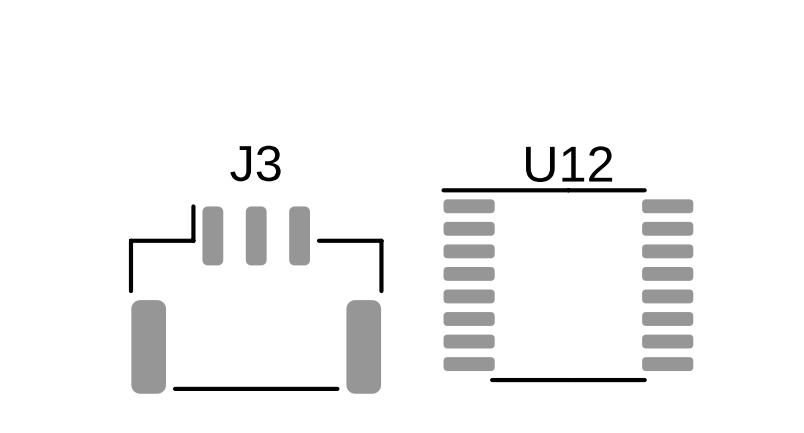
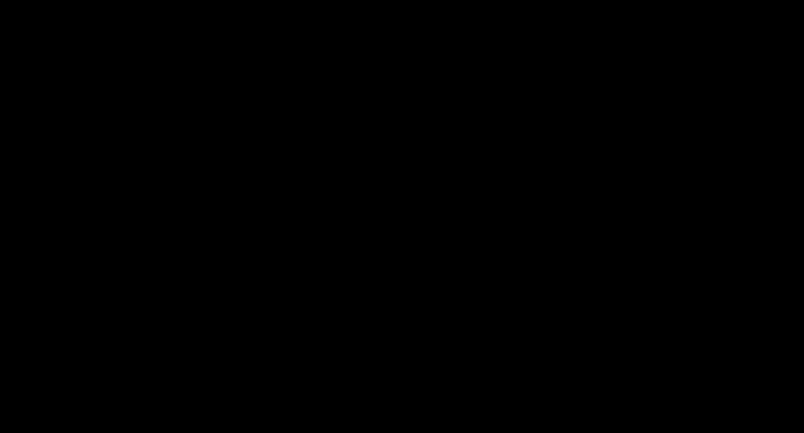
U12: (567, 285) -> none
J3: (256, 299) -> none

